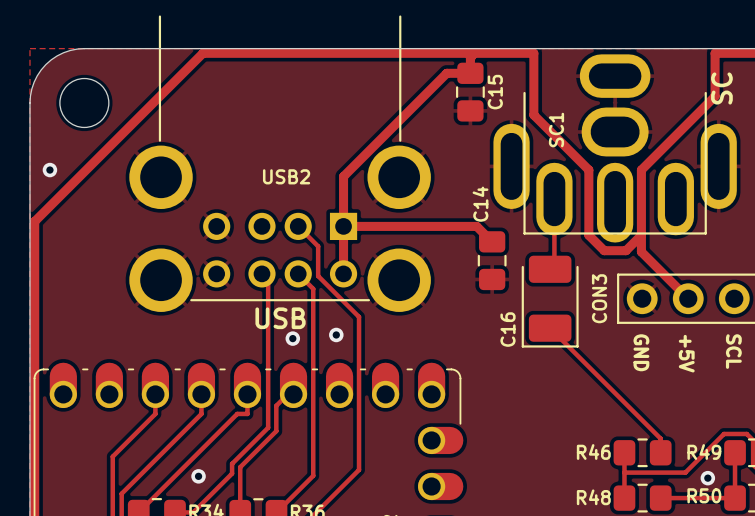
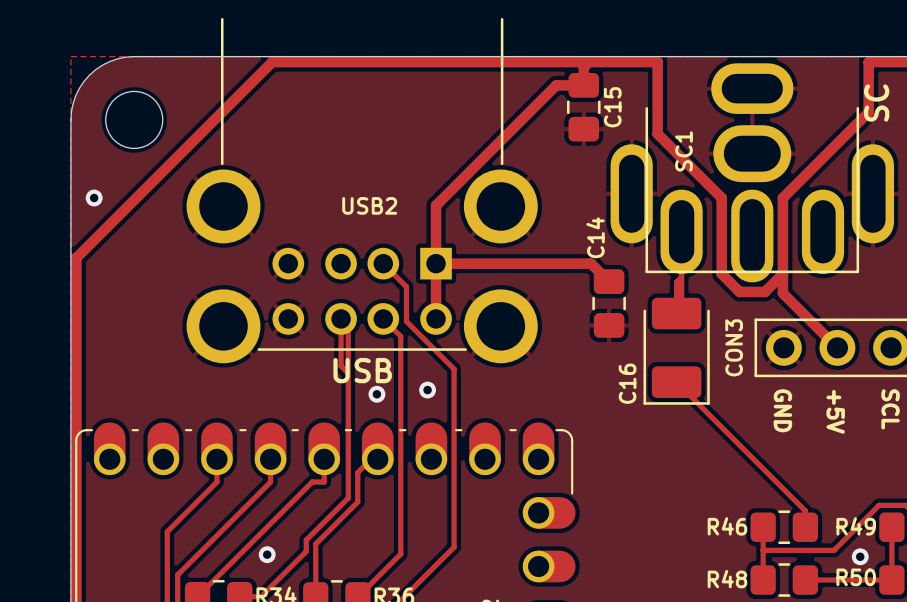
track: none -> (681, 277) (676, 282) (676, 313)
track: none -> (341, 318) (341, 365) (348, 373)

